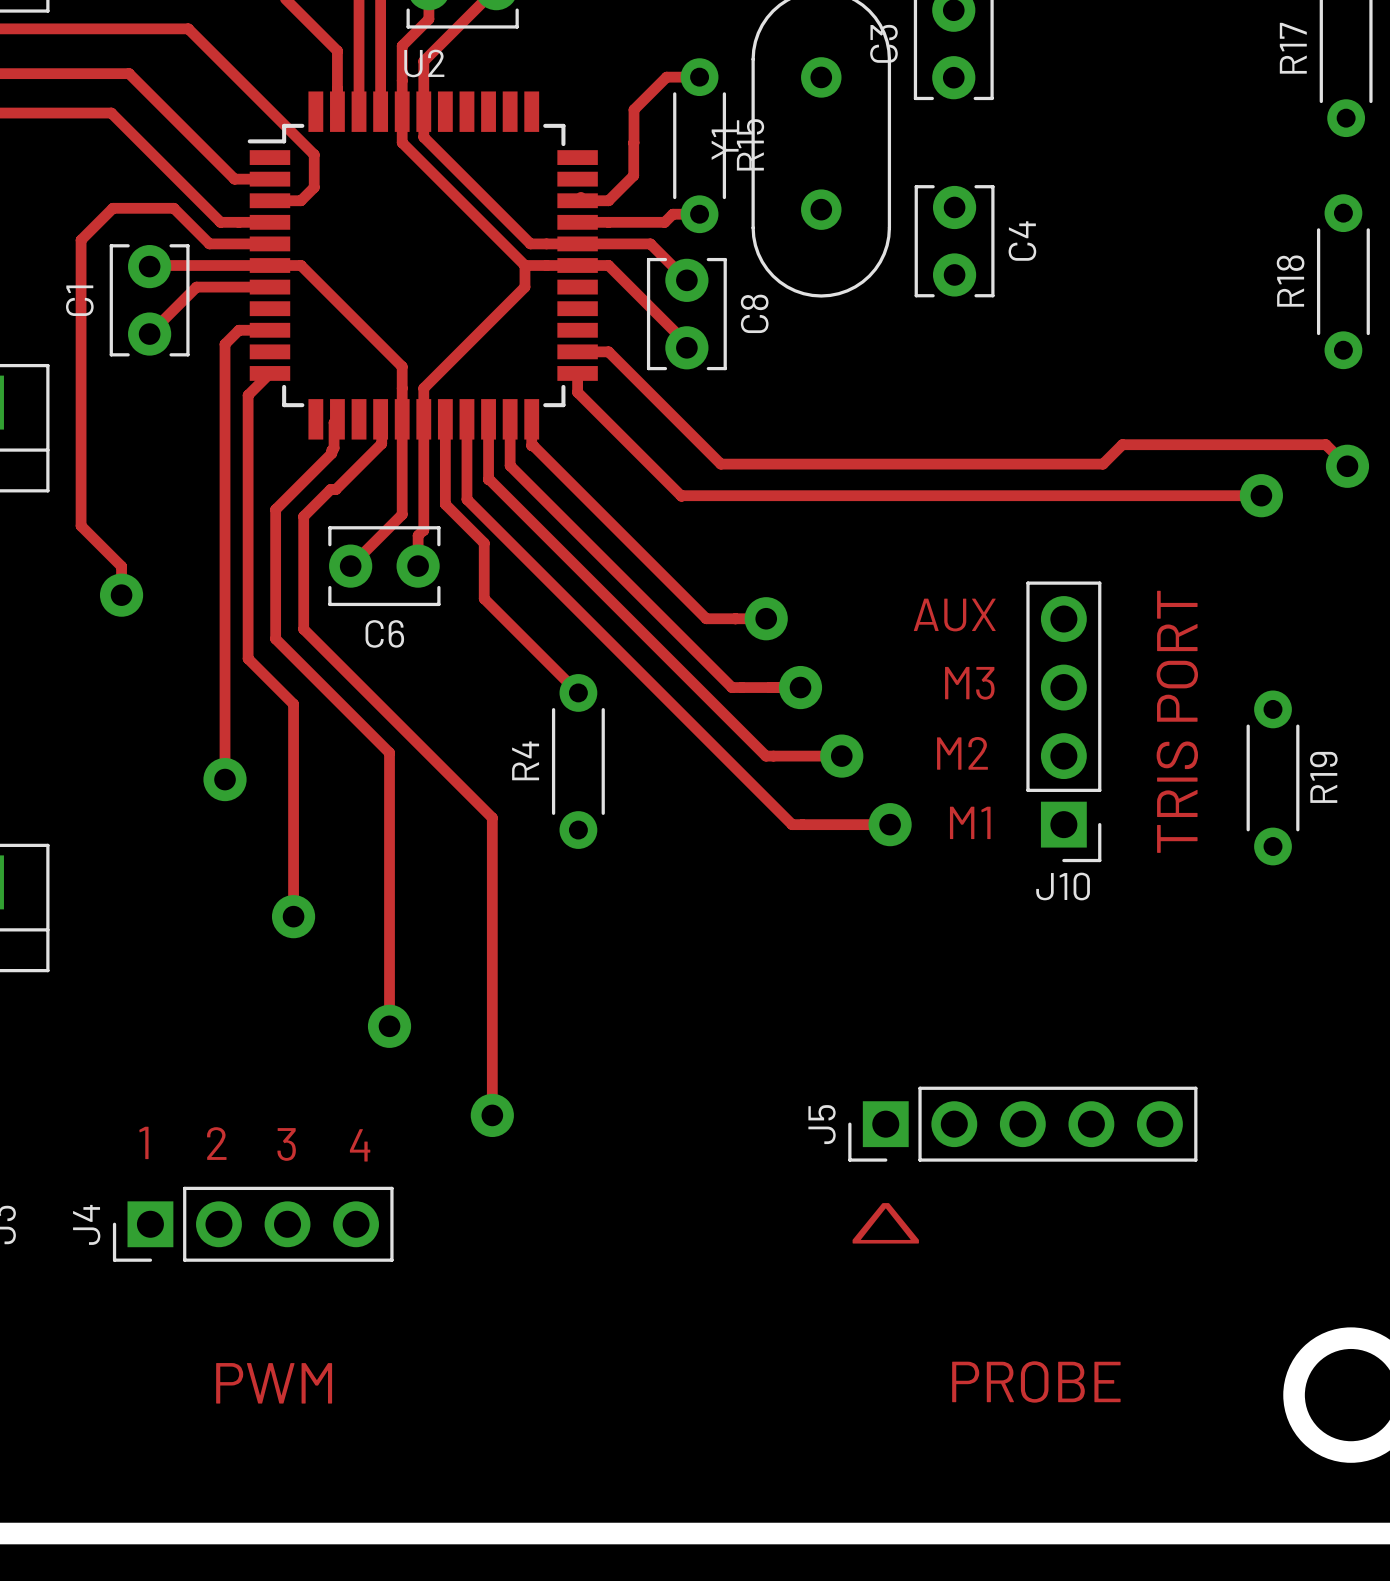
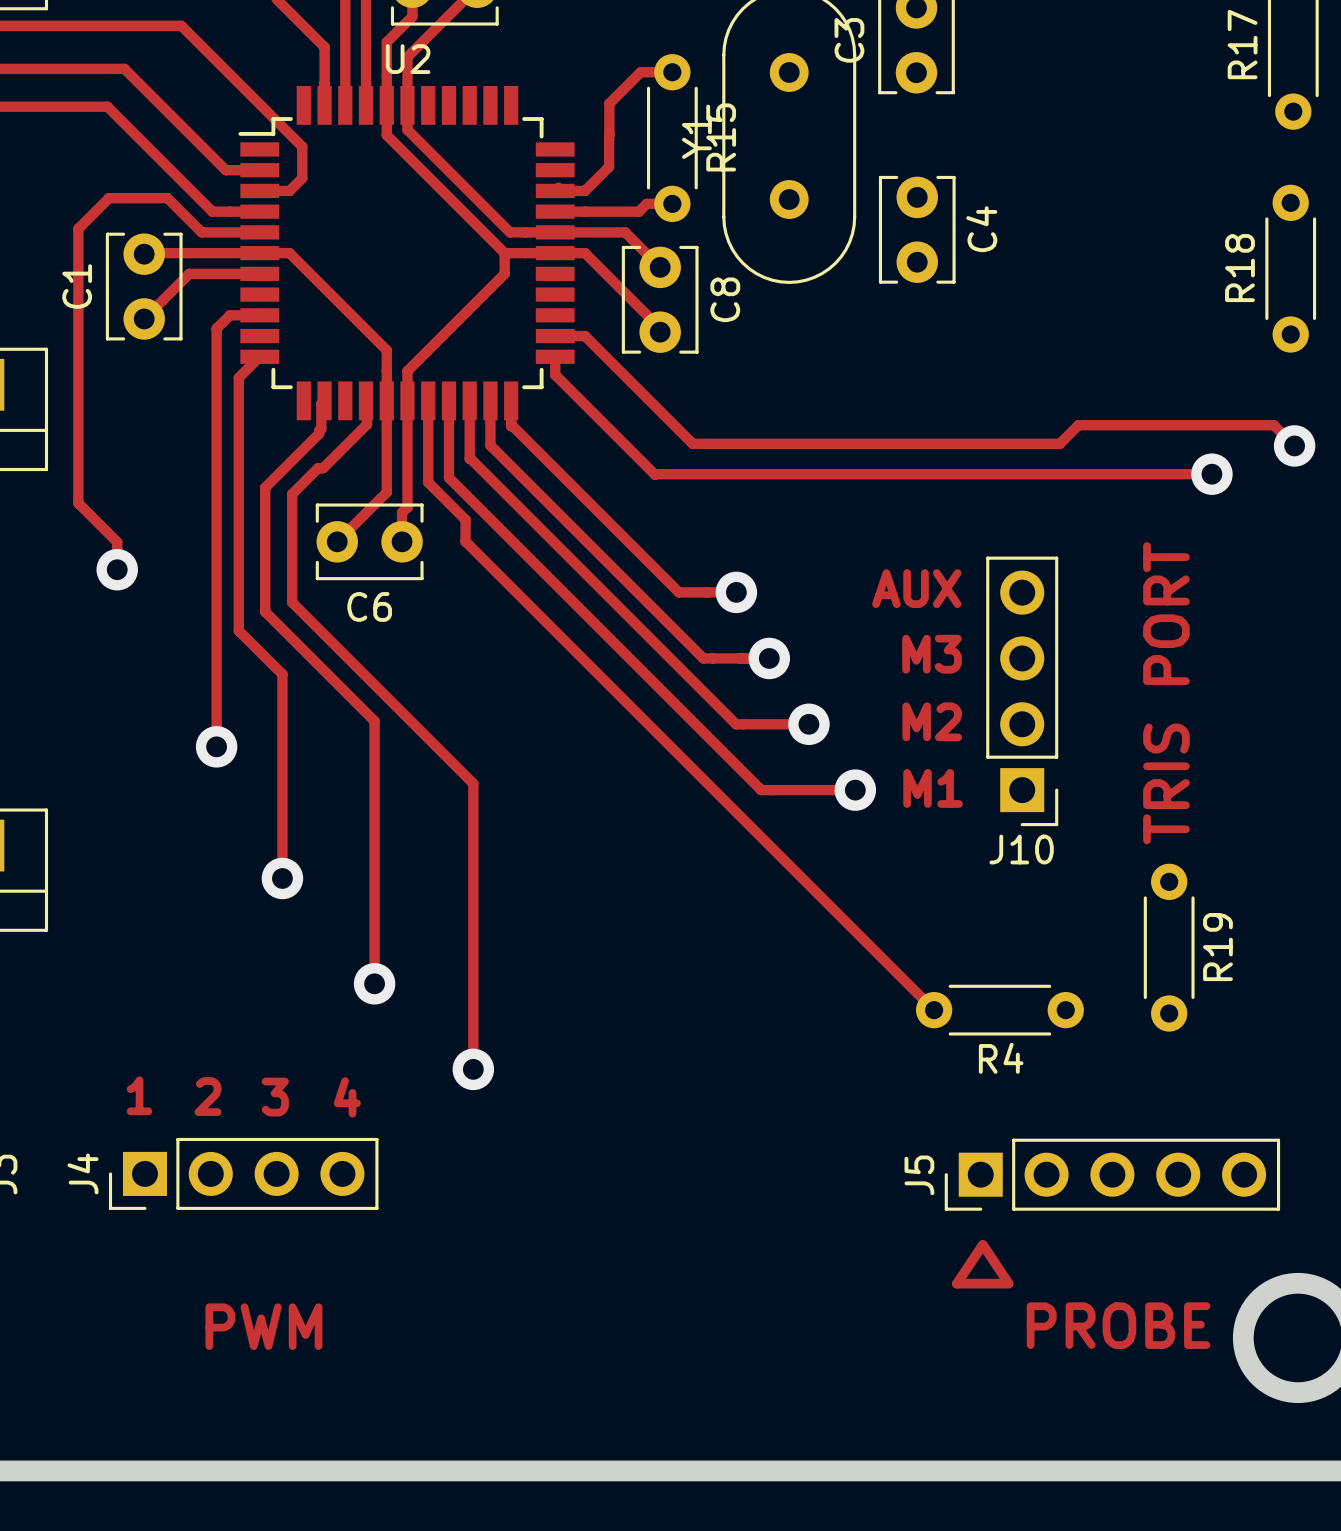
track: (484, 565) (484, 598) (578, 692) -> (465, 541) (934, 1010)
text position: TRIS PORT (1177, 721) -> TRIS PORT (1166, 693)
R4 name position: R4 (525, 760) -> R4 (1001, 1058)
R4 rotation: 0° (578, 761) -> 90° clockwise (999, 1010)
R4 position: (578, 761) -> (999, 1010)
R19 position: (1273, 777) -> (1169, 947)
J5 position: (1022, 1124) -> (1112, 1174)
text position: Δ (885, 1223) -> Δ (982, 1264)
text position: PROBE (1036, 1381) -> PROBE (1118, 1325)

